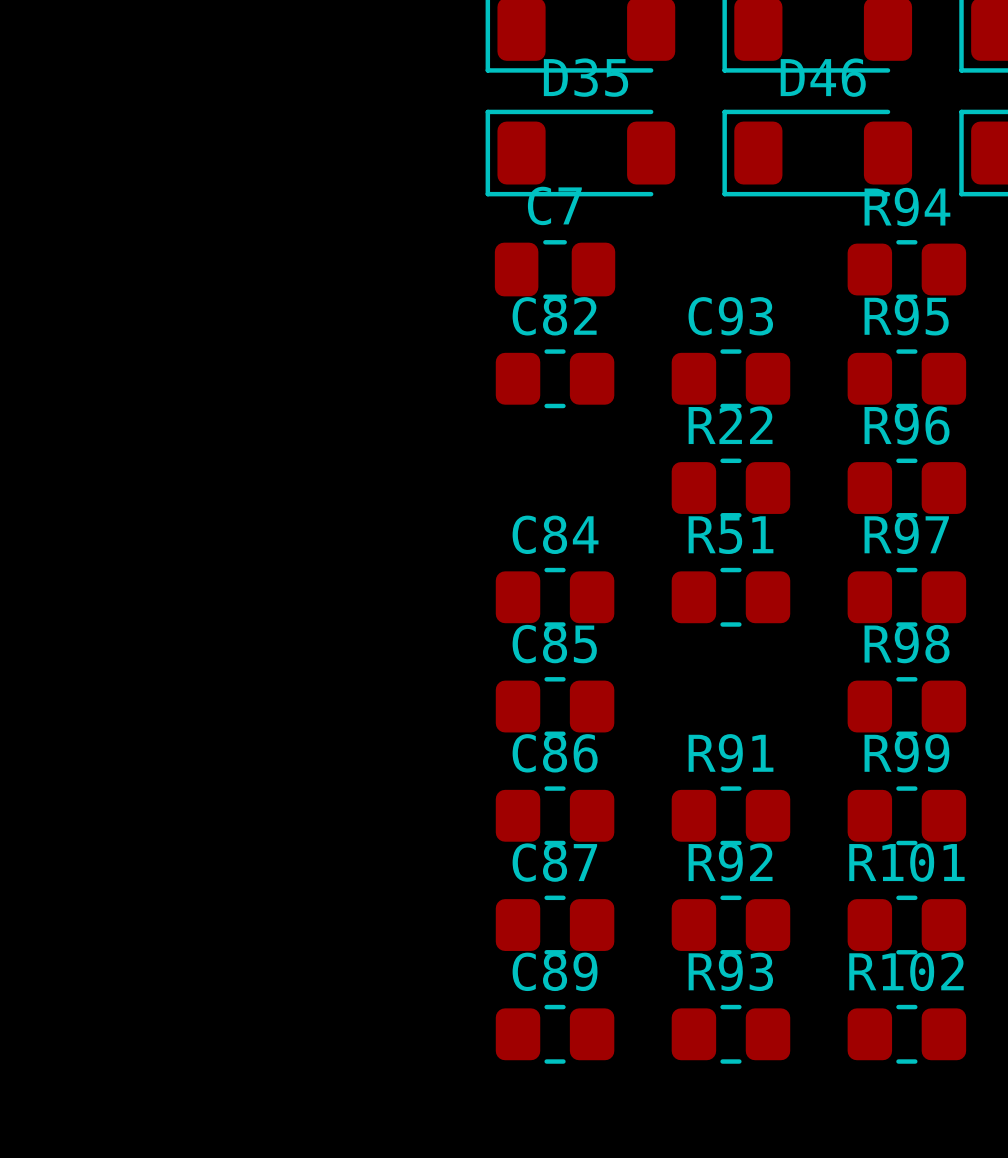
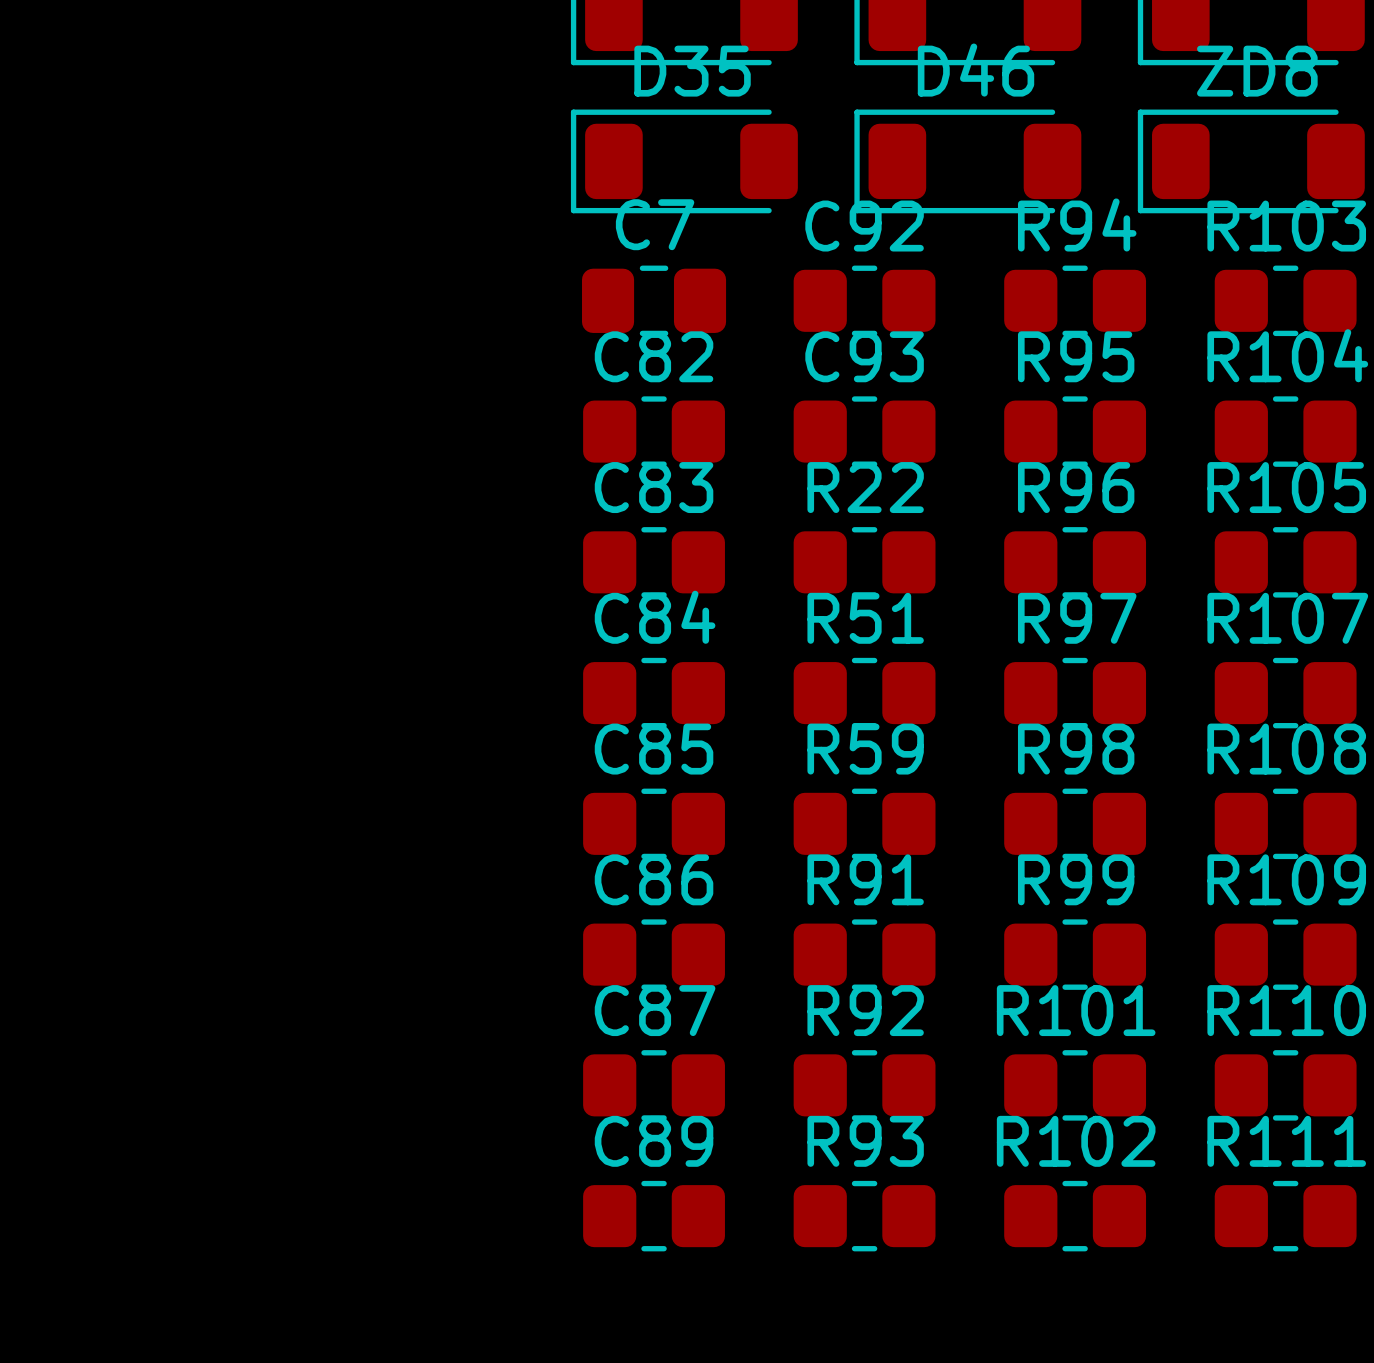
C92: none -> (864, 300)
C83: none -> (654, 562)
R59: none -> (864, 823)

